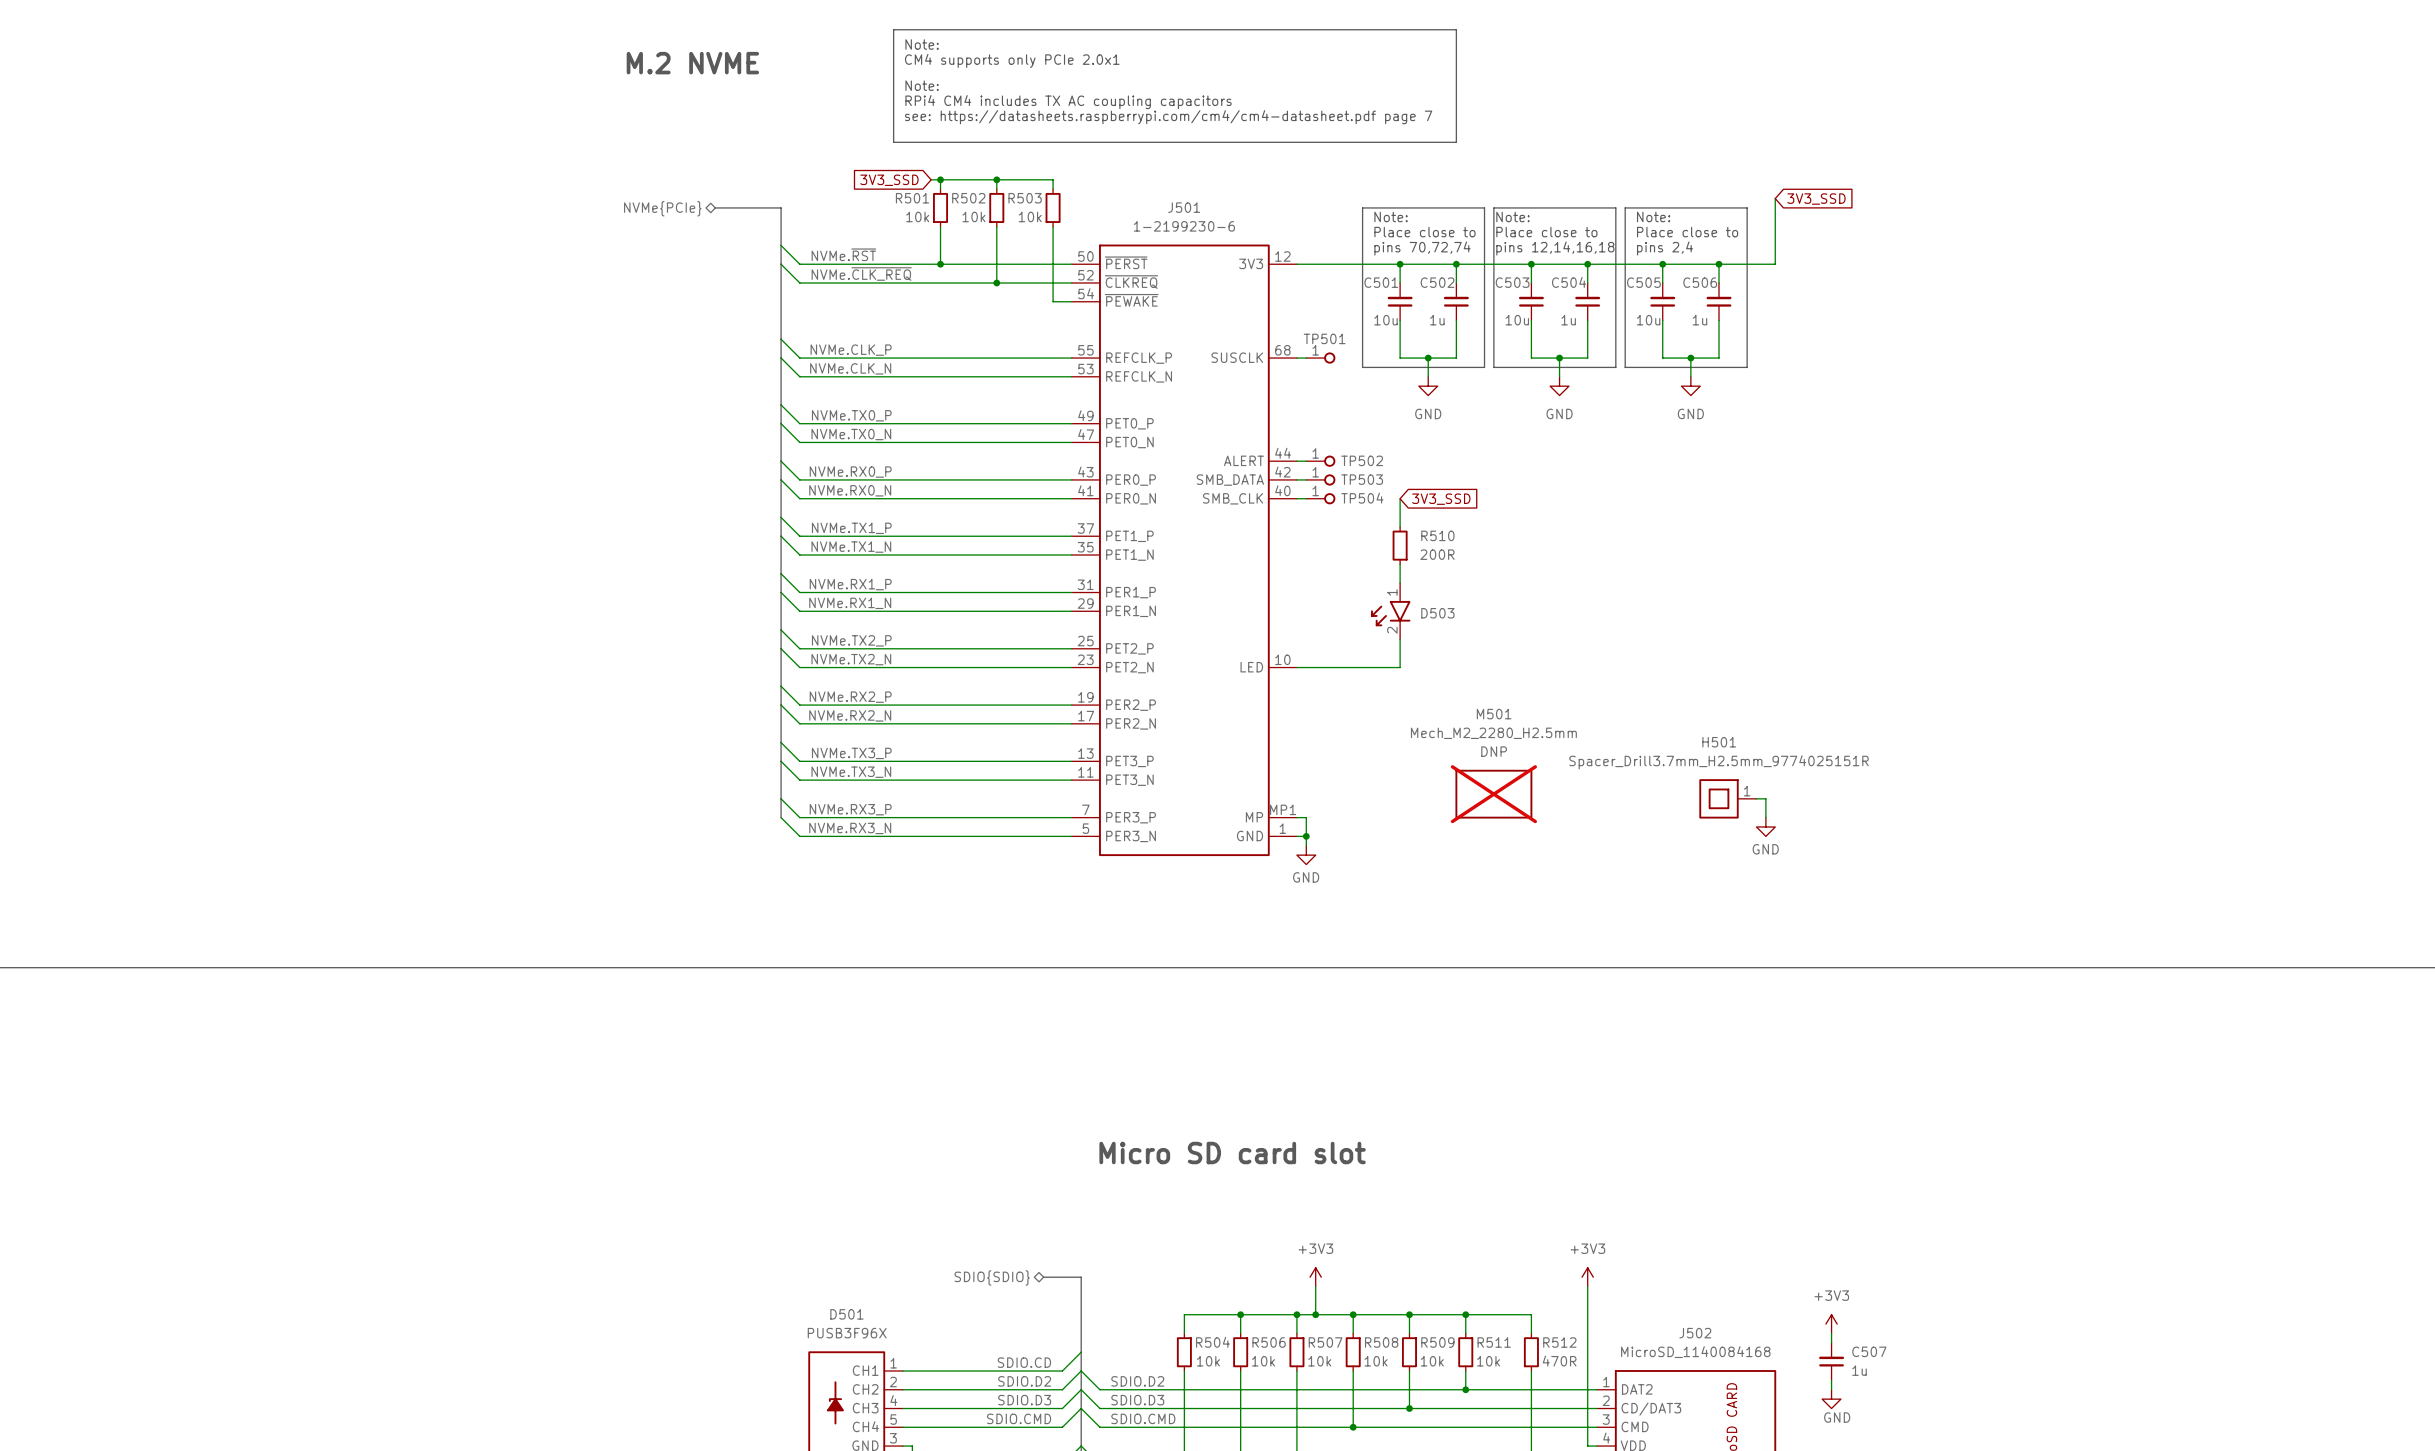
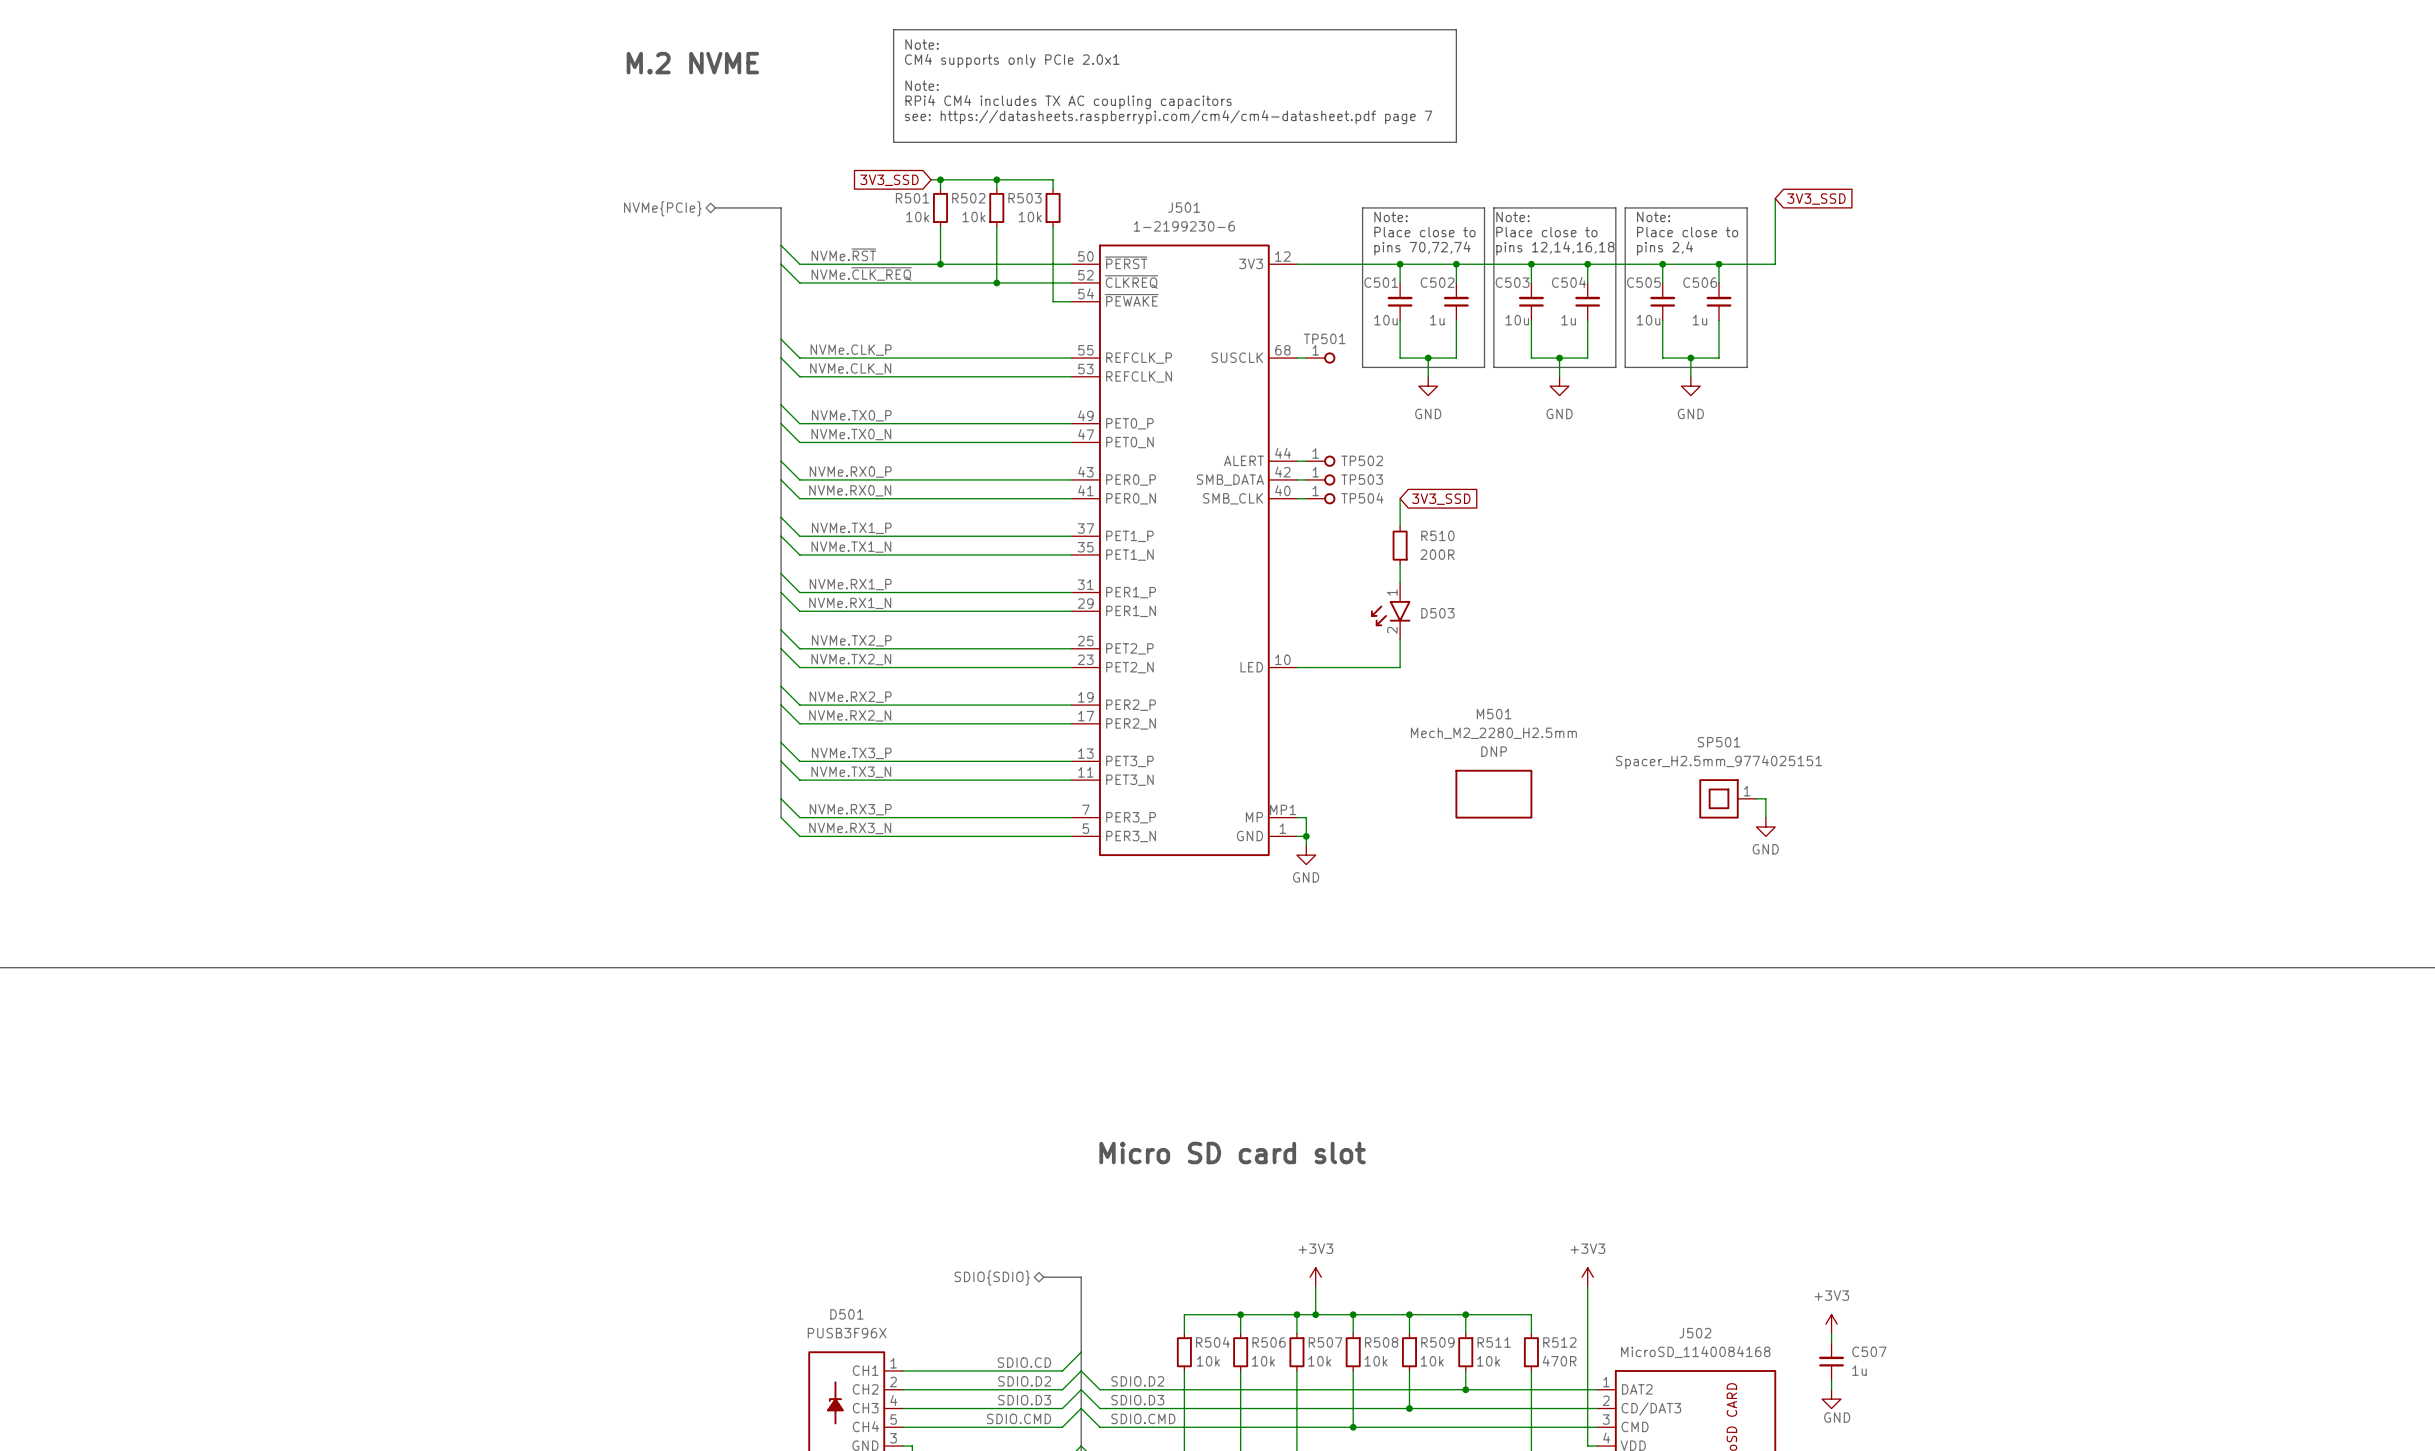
H501 name: H501 (1719, 742) -> SP501 (1719, 742)
H501 value: Spacer_Drill3.7mm_H2.5mm_9774025151R (1719, 762) -> Spacer_H2.5mm_9774025151 (1719, 762)
M501 do-not-place cross: (1493, 794) -> none

